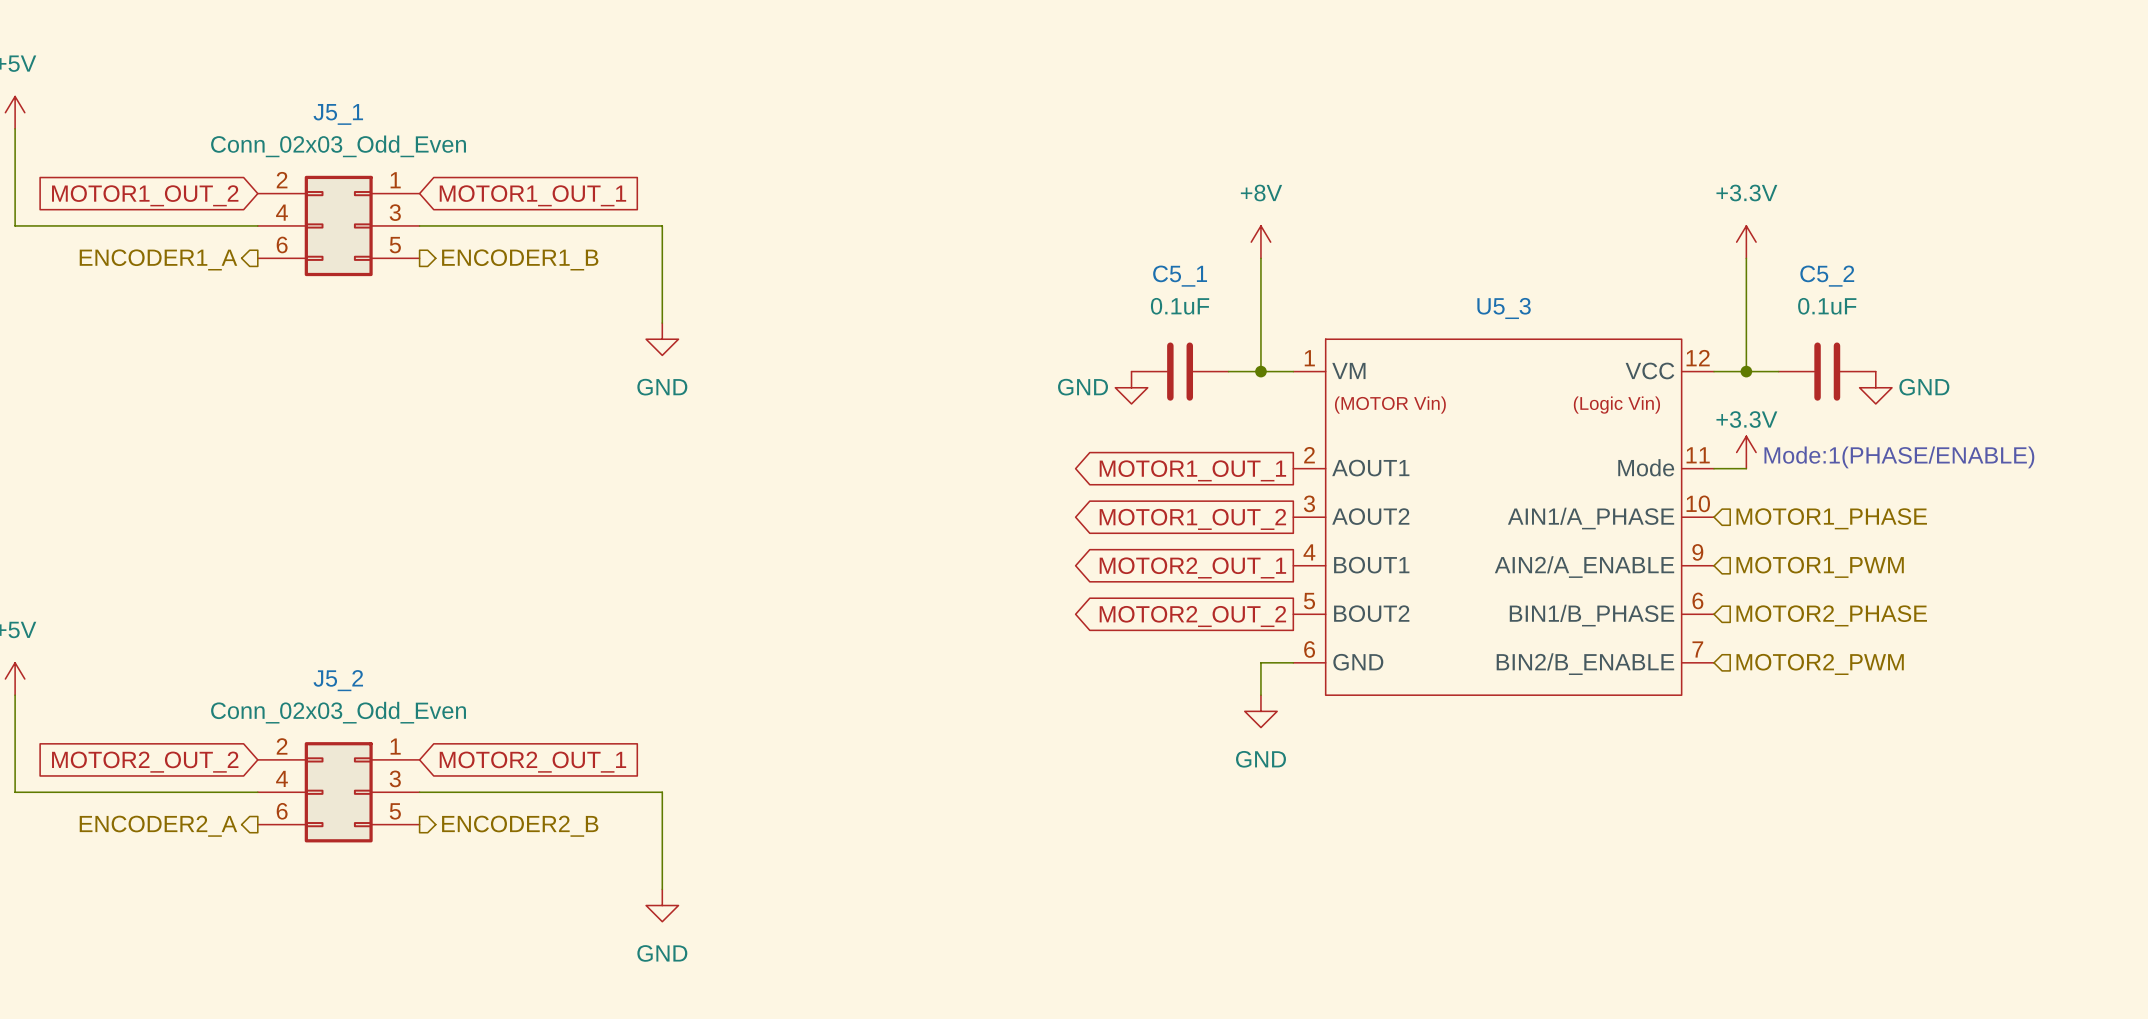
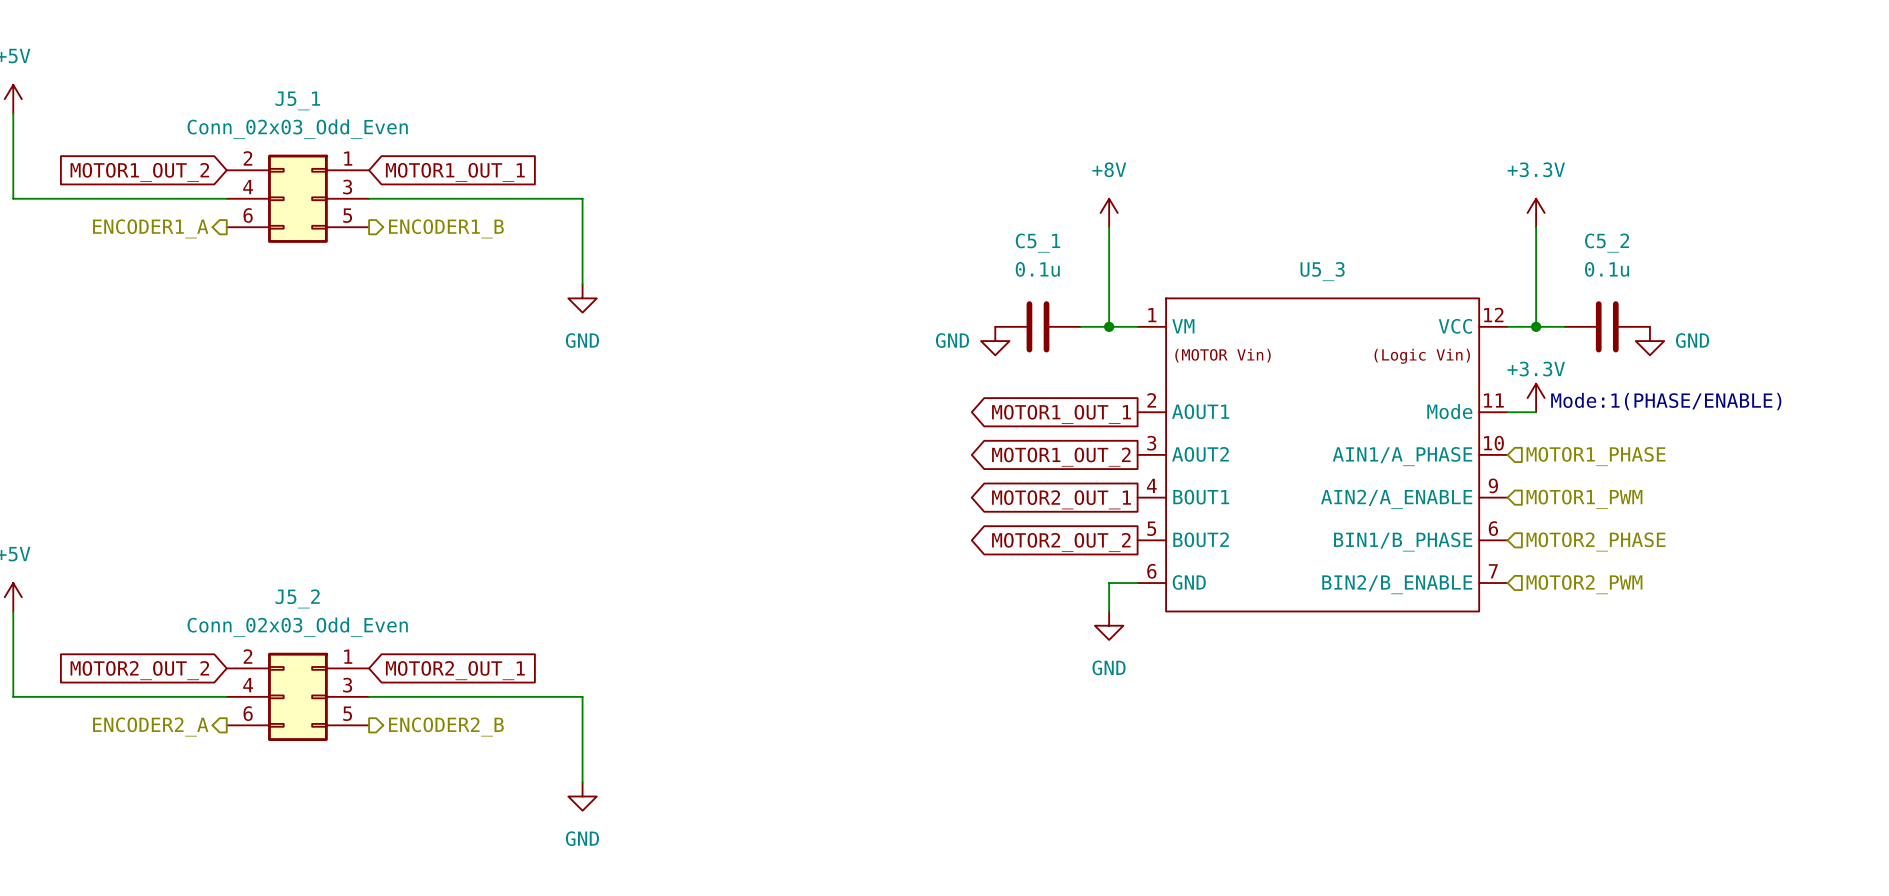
C5_1 value: 0.1uF (1180, 306) -> 0.1u (1037, 269)
C5_2 value: 0.1uF (1827, 306) -> 0.1u (1607, 269)

